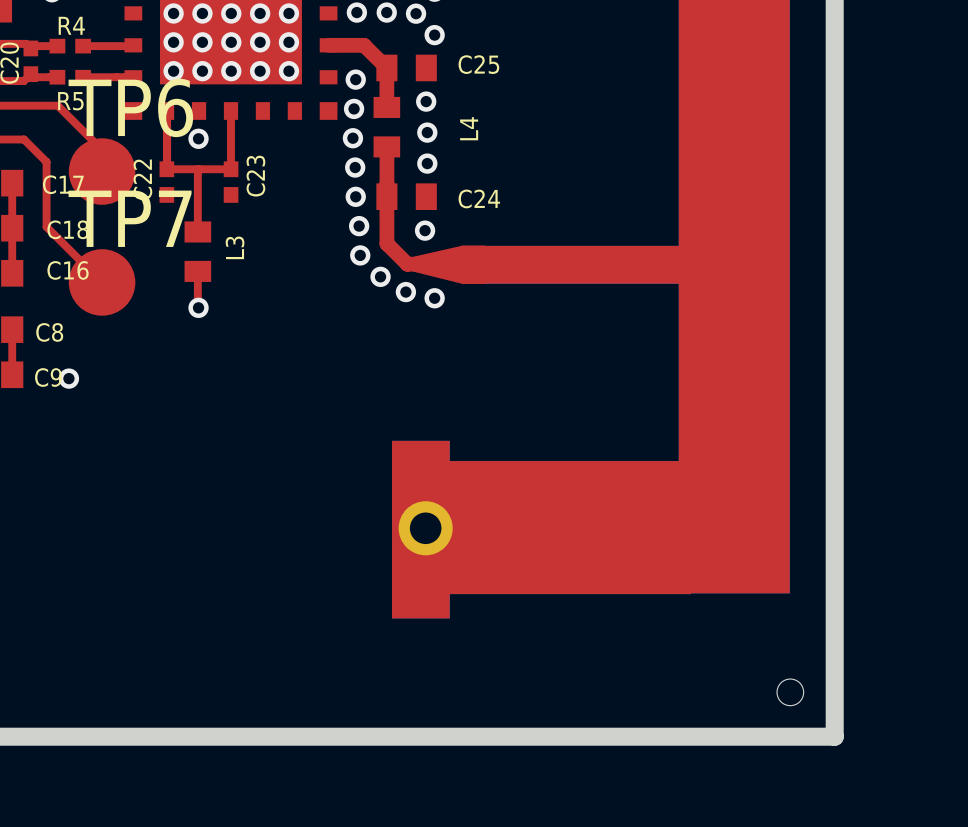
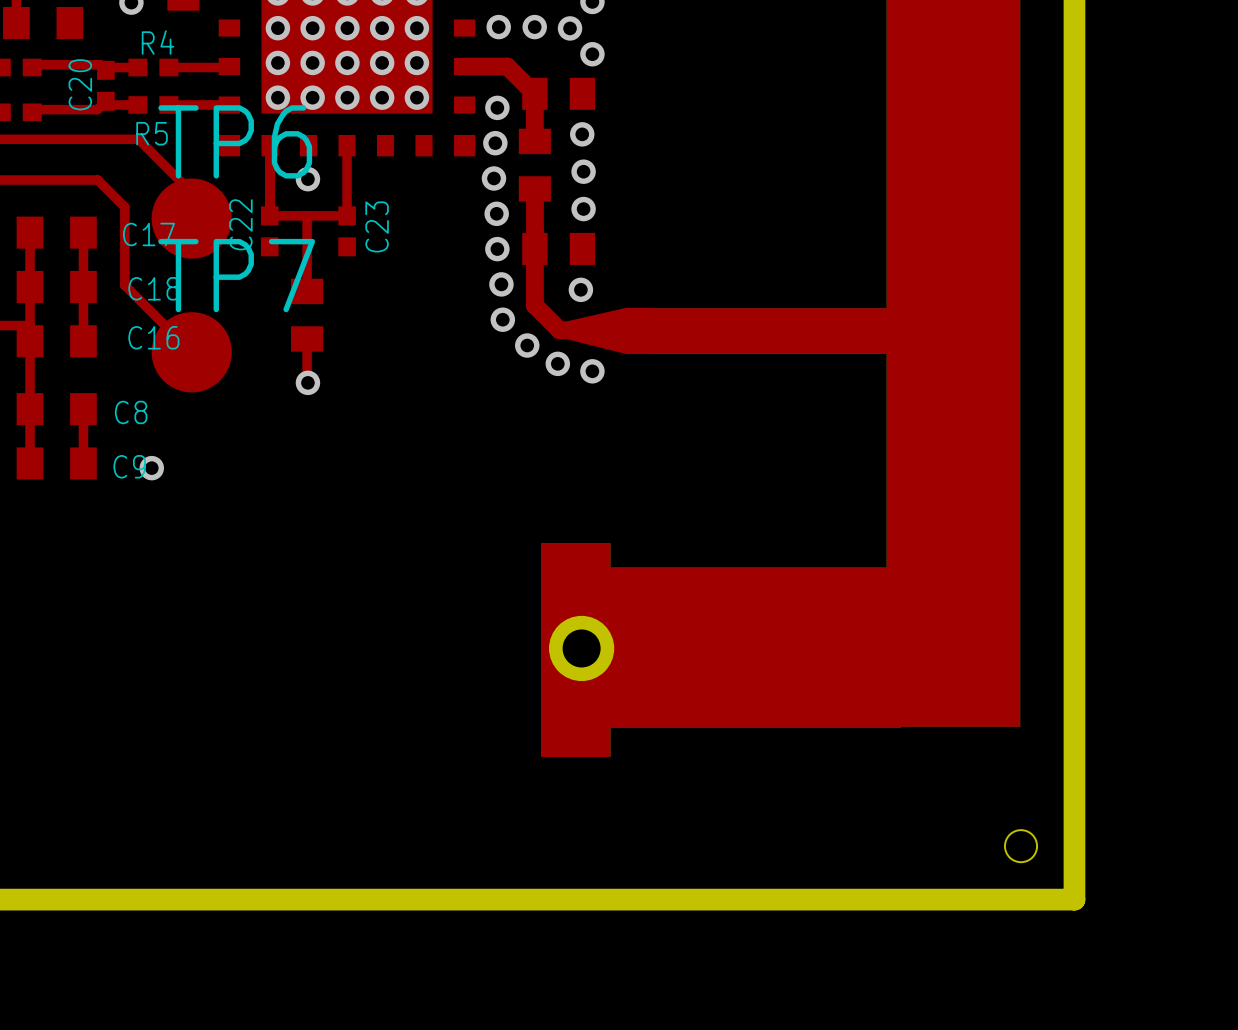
C25 name: C25 (478, 64) -> none
L4 name: L4 (469, 128) -> none
C24 name: C24 (479, 198) -> none
L3 name: L3 (235, 247) -> none

